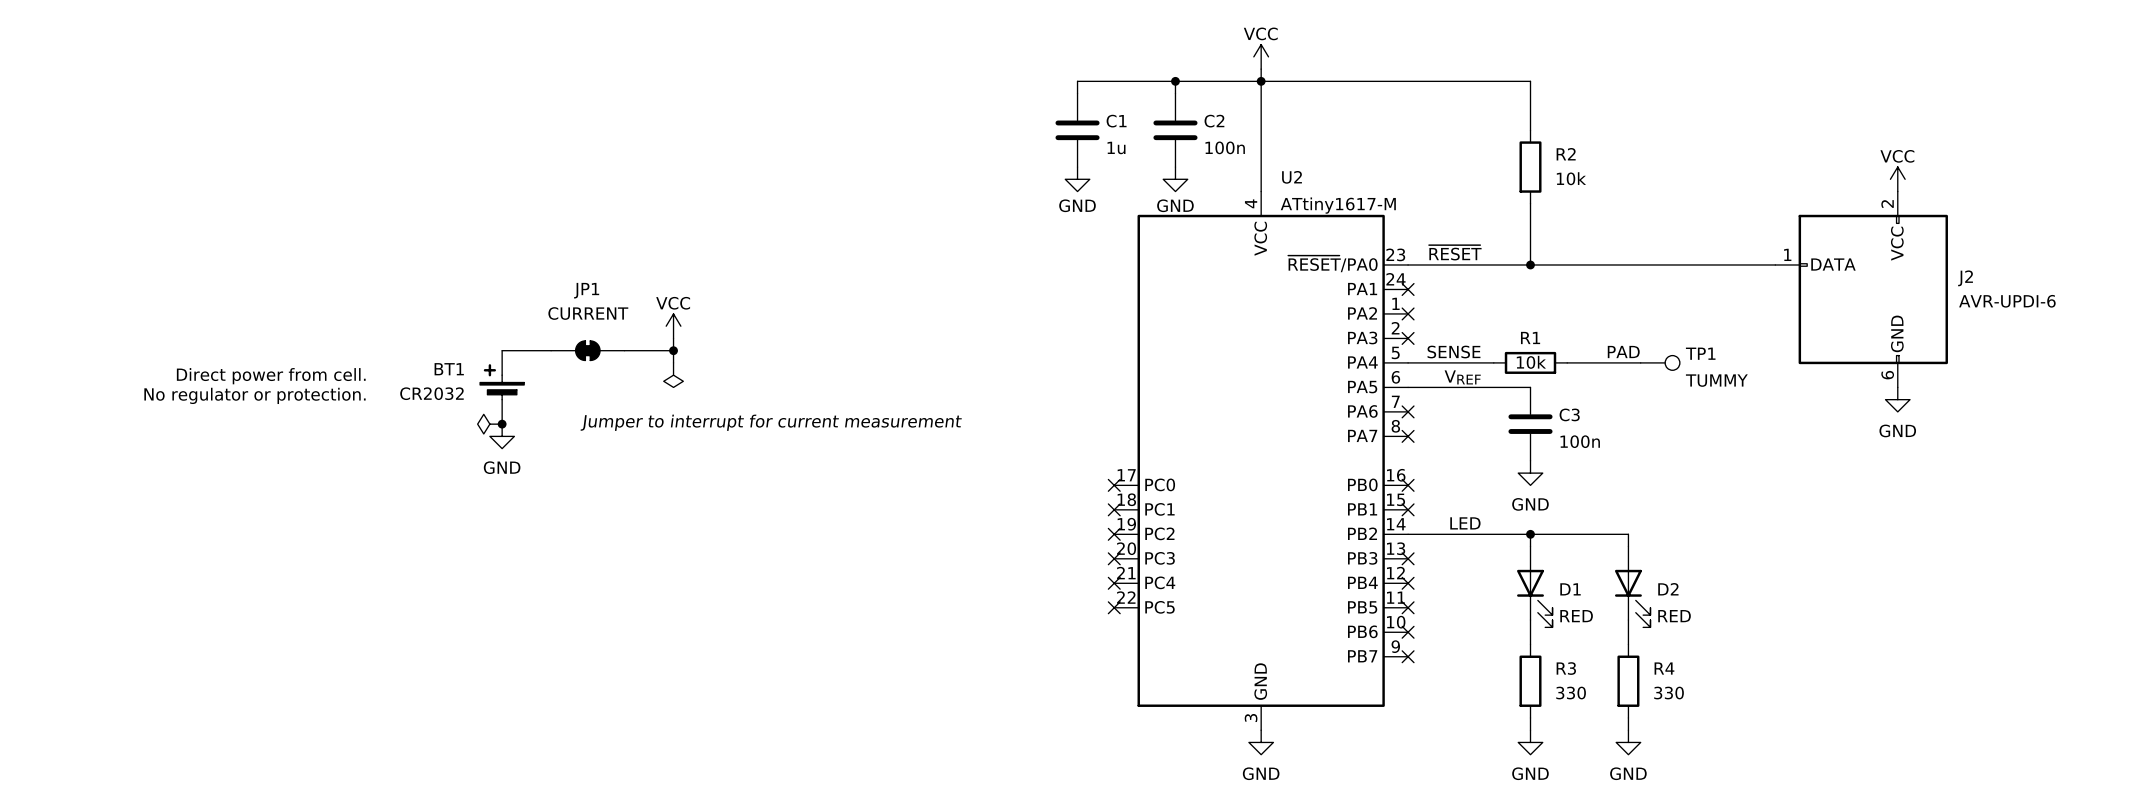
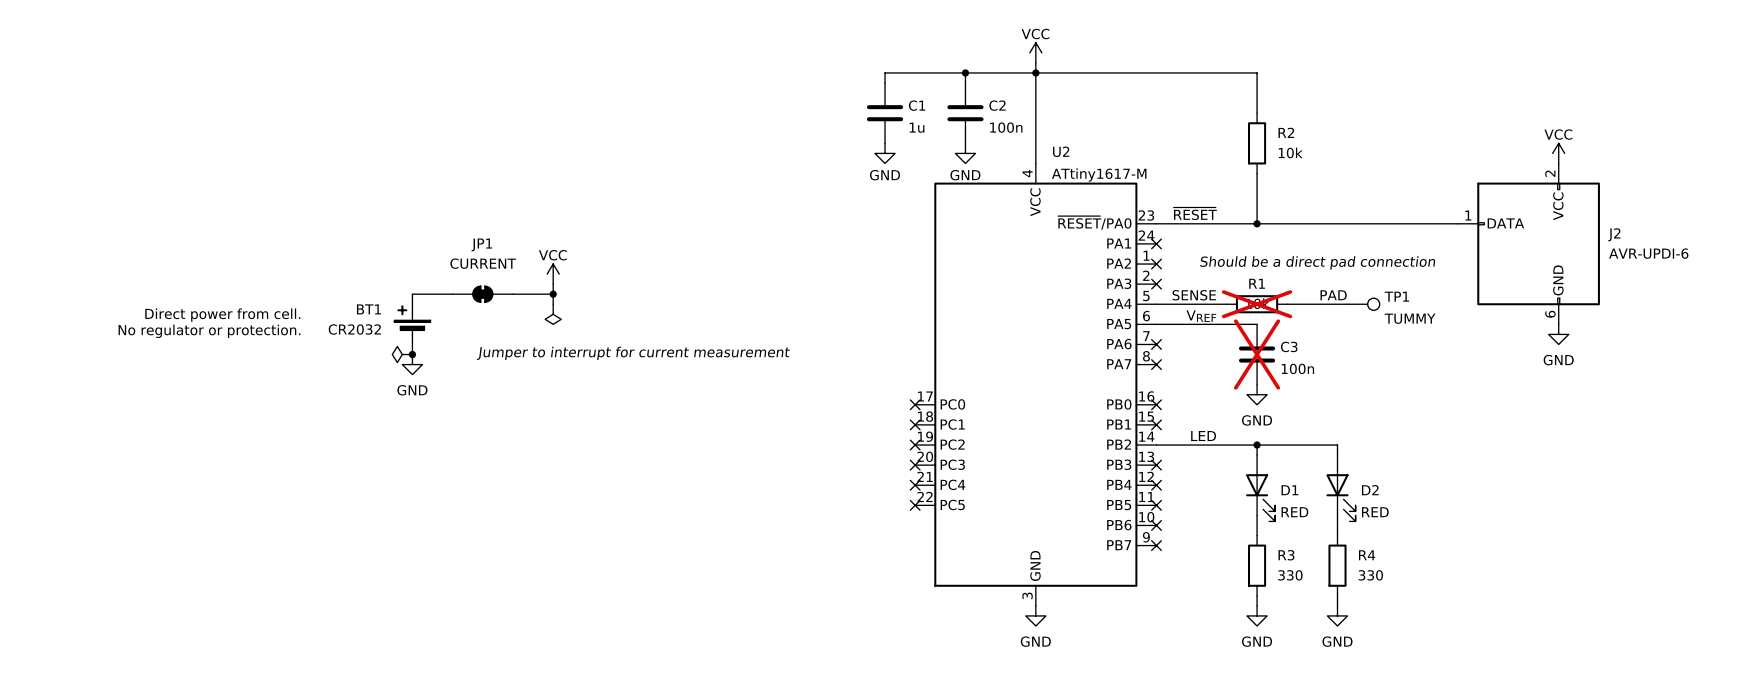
text: none -> Should be a direct pad connection (1317, 262)
R1 do-not-place cross: none -> (1257, 304)
C3 do-not-place cross: none -> (1257, 354)

